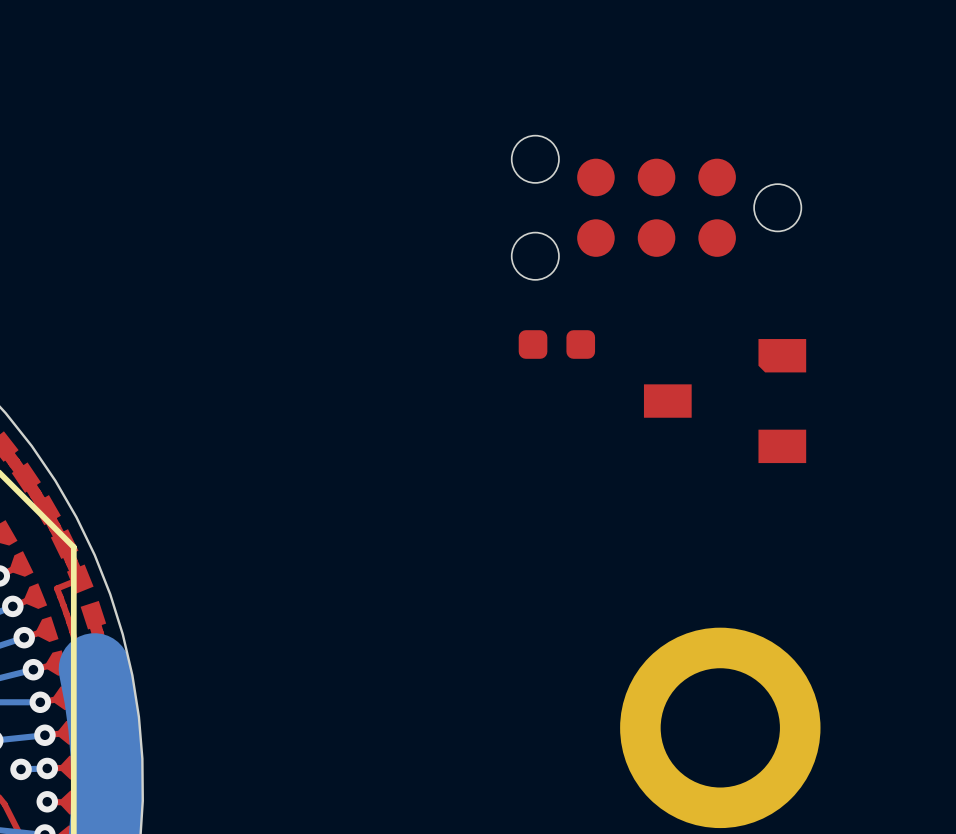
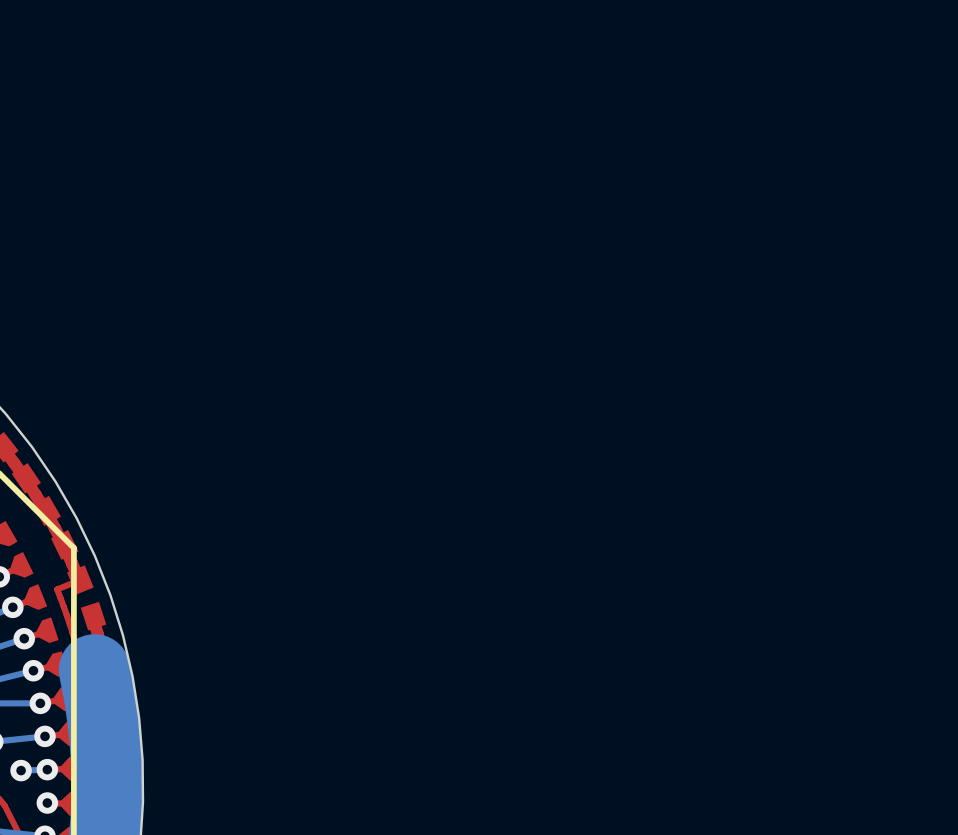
part: (656, 207) -> none
part: (556, 344) -> none
part: (725, 401) -> none
part: (720, 727) -> none

